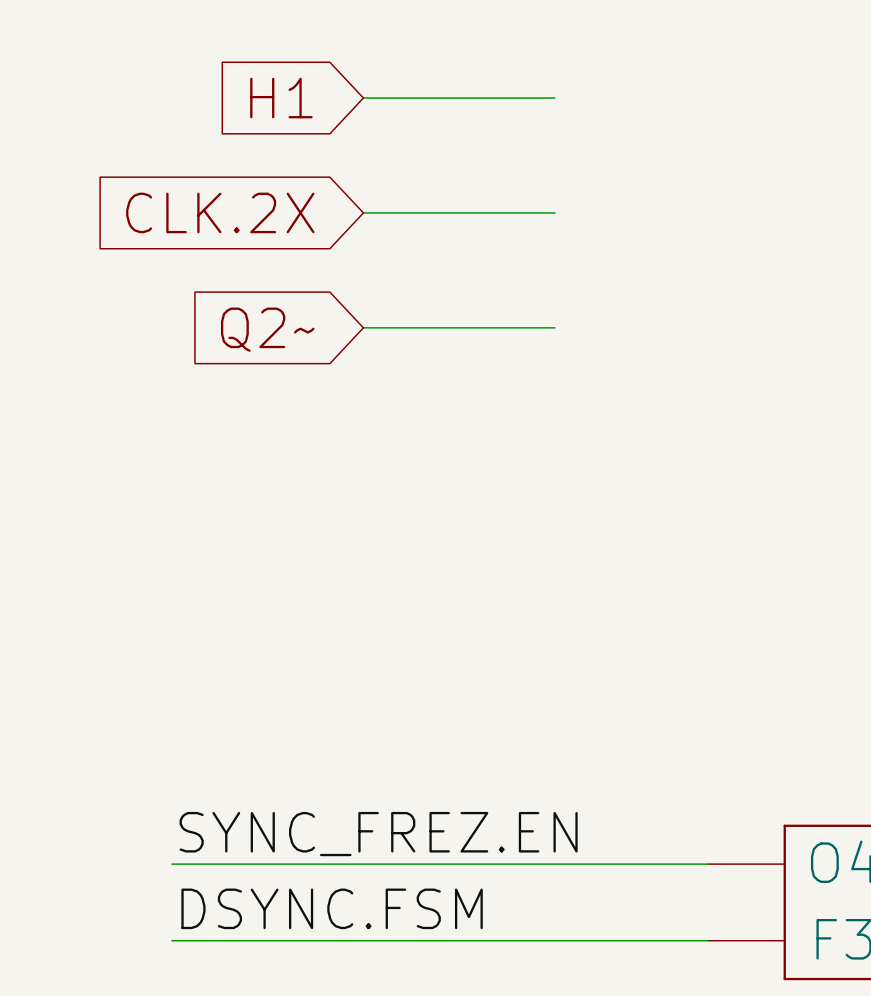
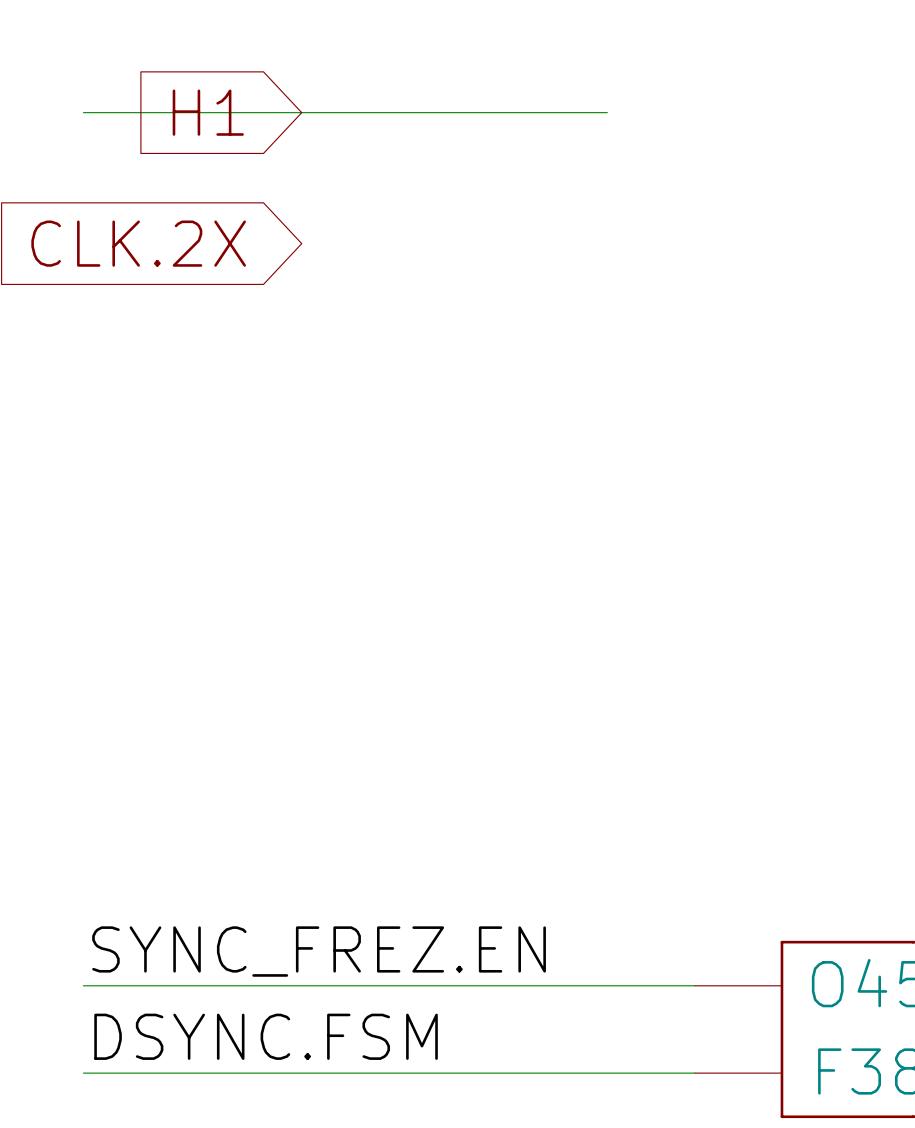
wire: none -> (520, 112) (607, 112)
wire: (363, 212) (554, 212) -> (83, 112) (301, 112)
wire: (363, 327) (554, 327) -> none
global label: Q2~ (267, 329) -> none

